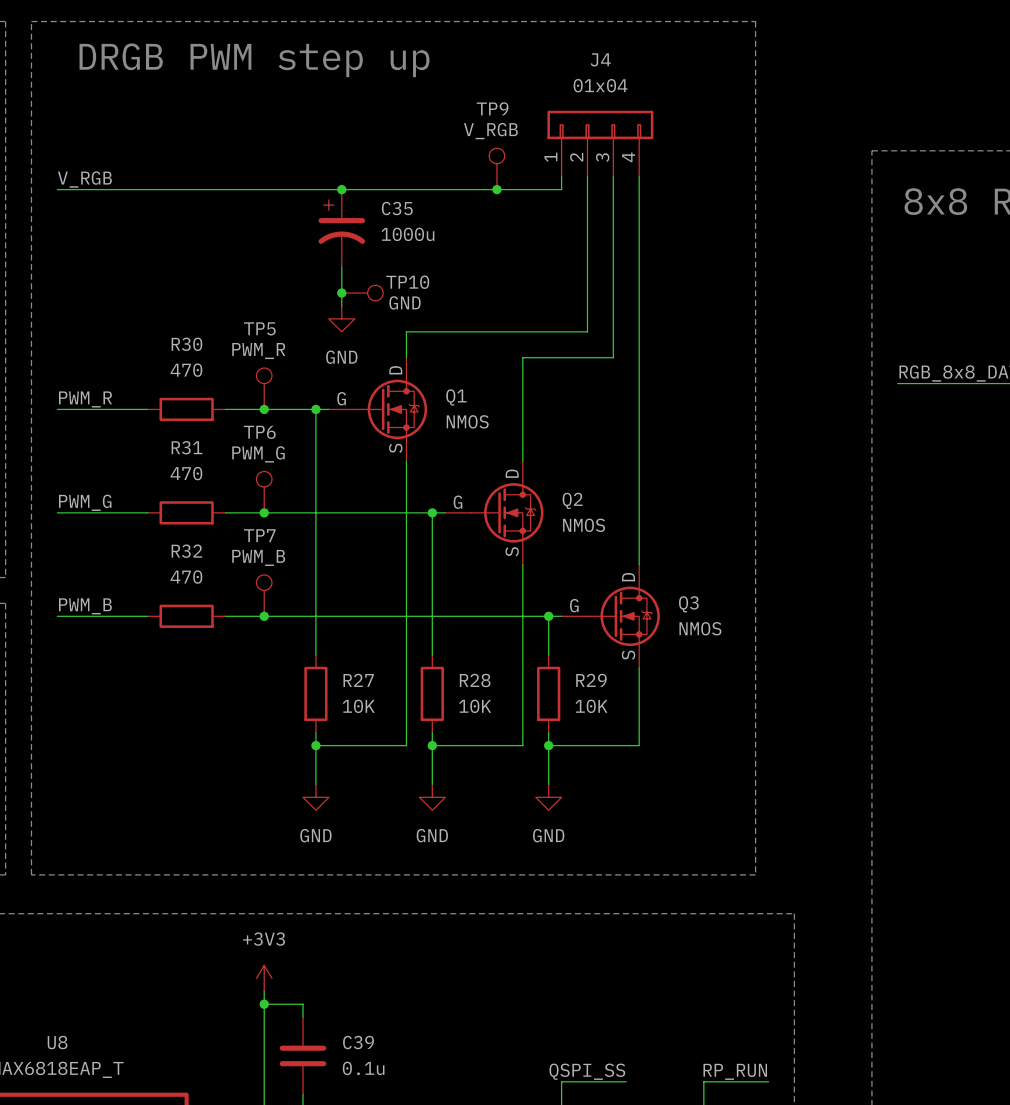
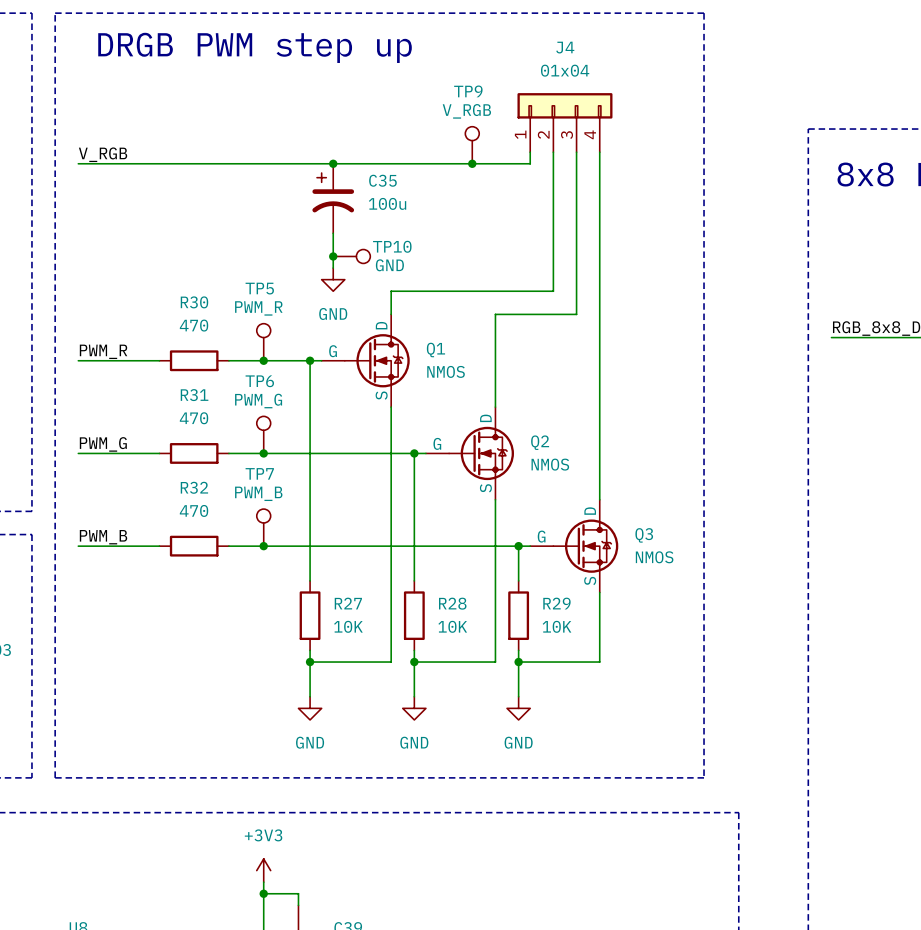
C35 value: 1000u (407, 234) -> 100u (387, 203)

